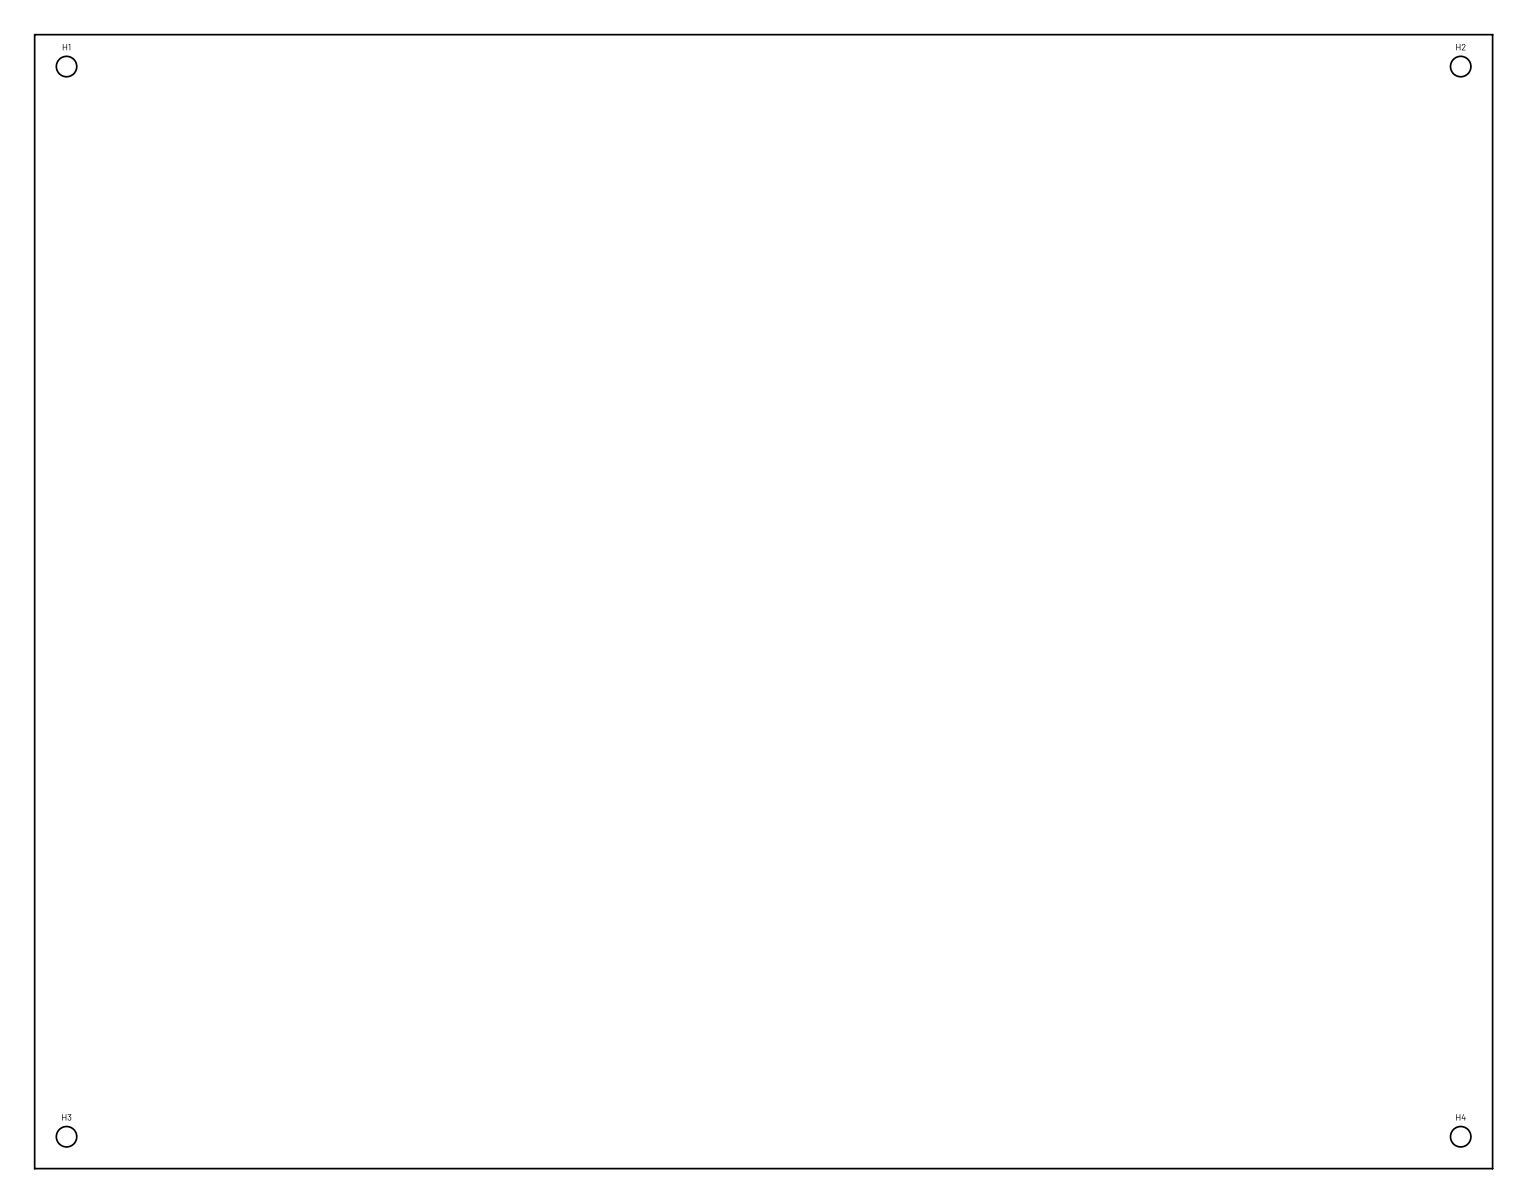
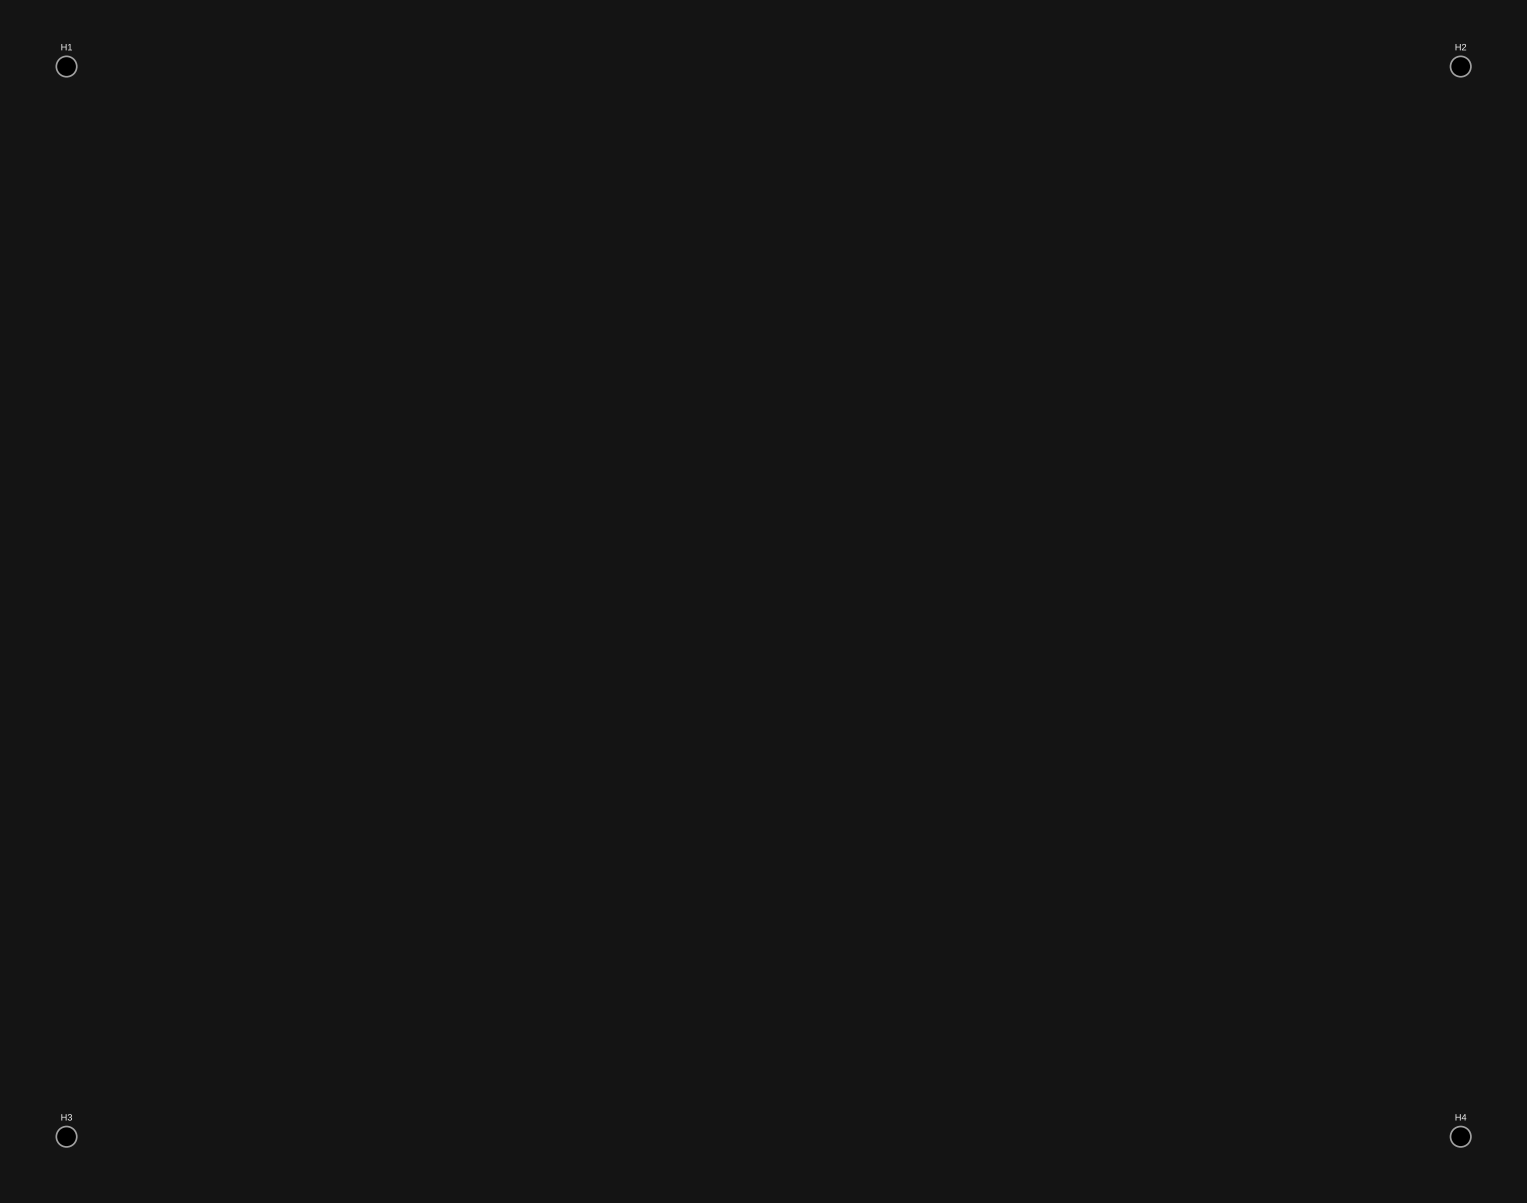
board edge: (34, 34) (1492, 34) (1492, 1168) (34, 1168) (34, 34) -> none

